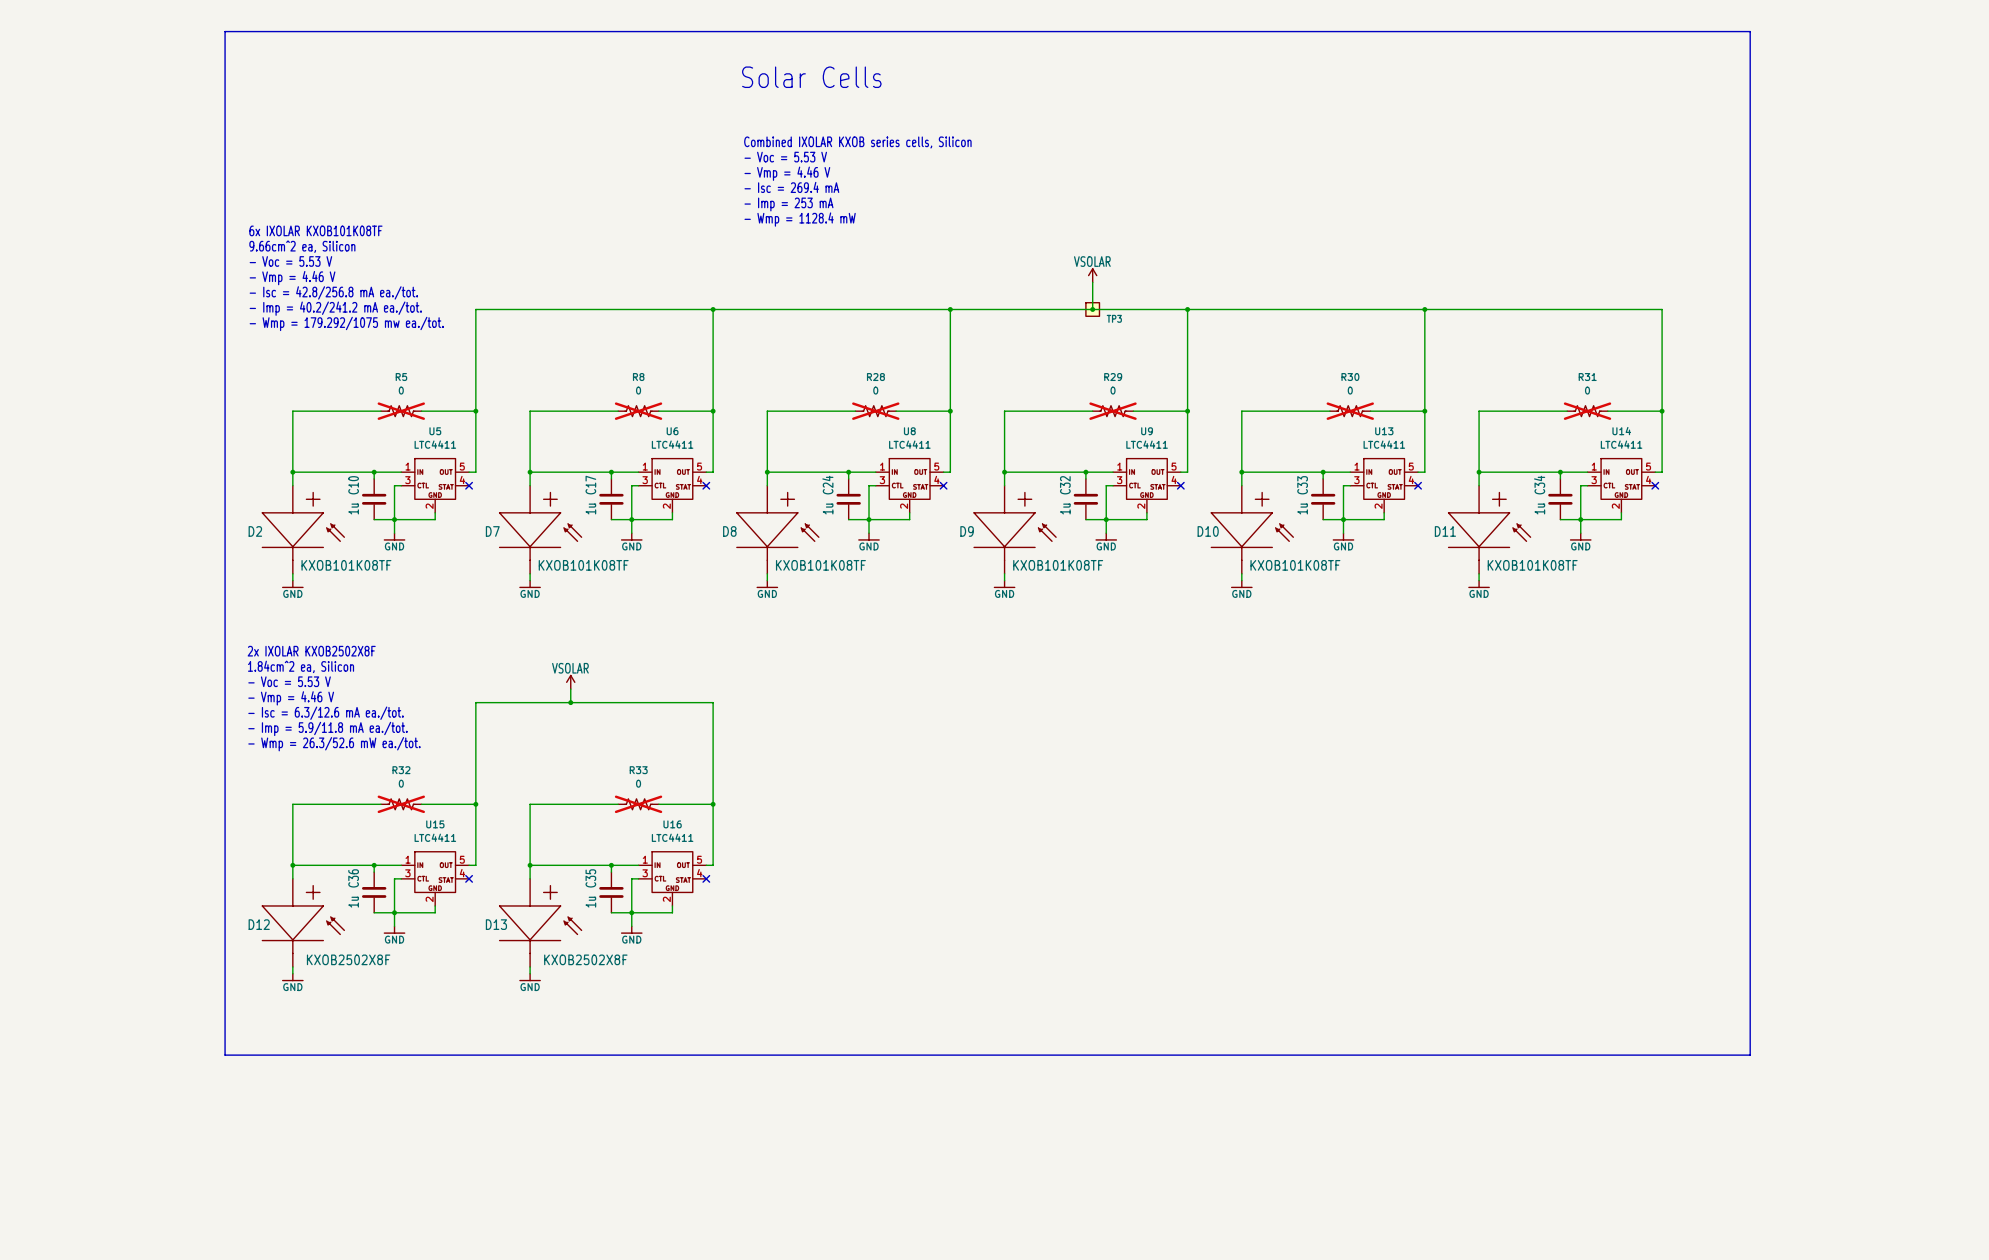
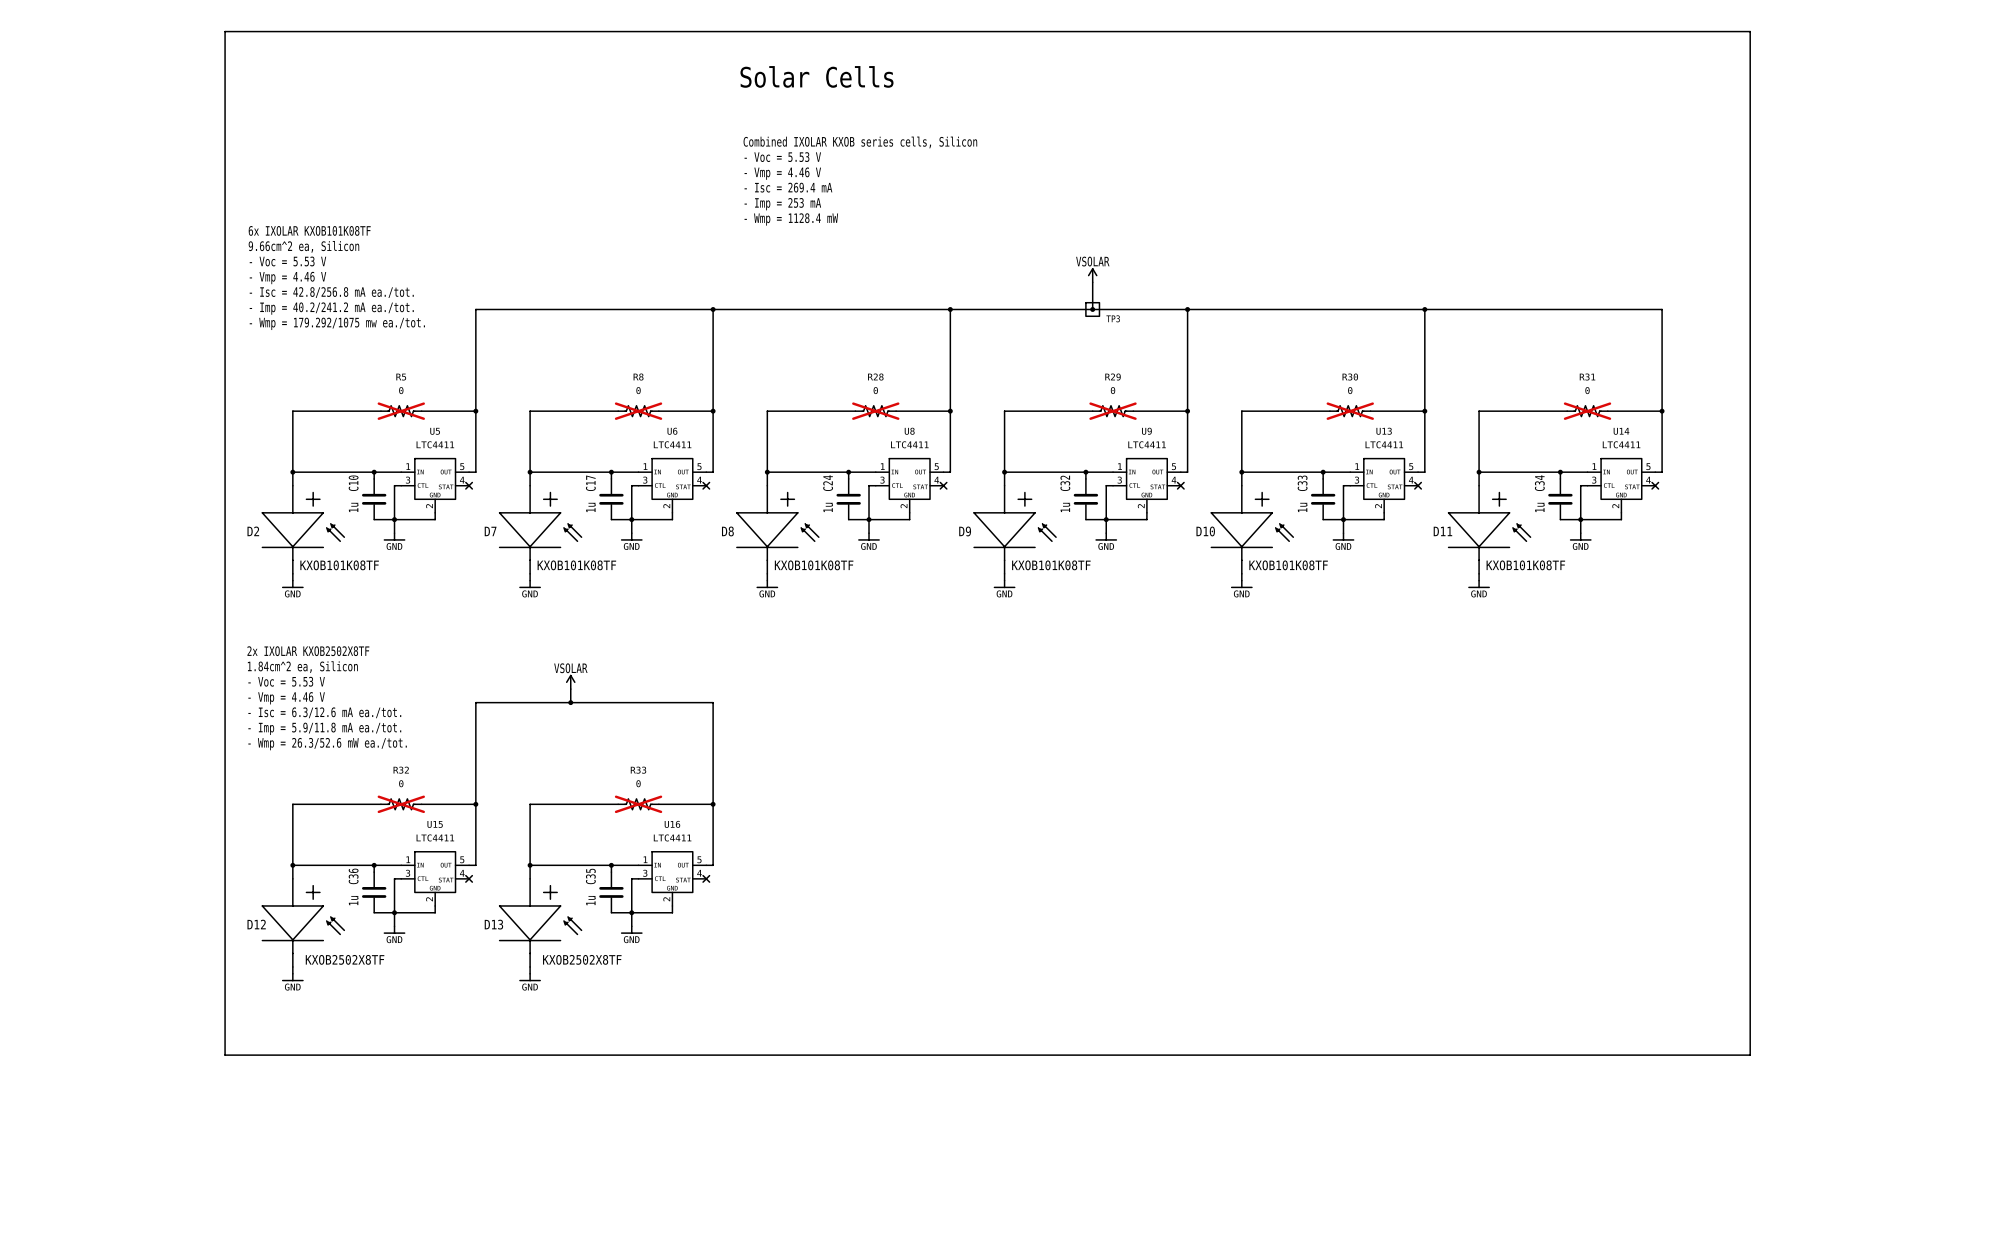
text: 2x IXOLAR KXOB2502X8F (311, 651) -> 2x IXOLAR KXOB2502X8TF (308, 651)
D12 value: KXOB2502X8F (348, 959) -> KXOB2502X8TF (345, 959)
D13 value: KXOB2502X8F (585, 959) -> KXOB2502X8TF (582, 959)

